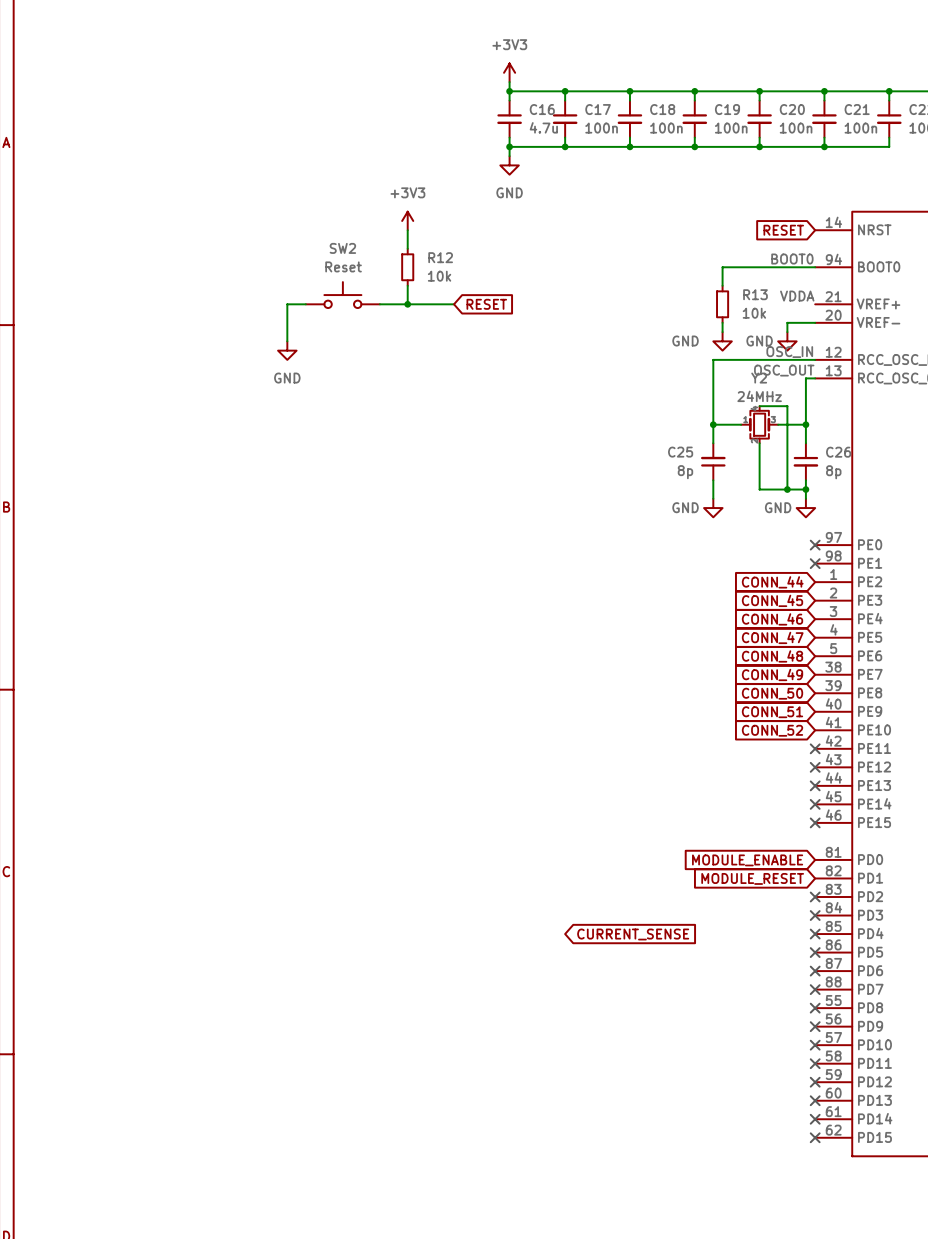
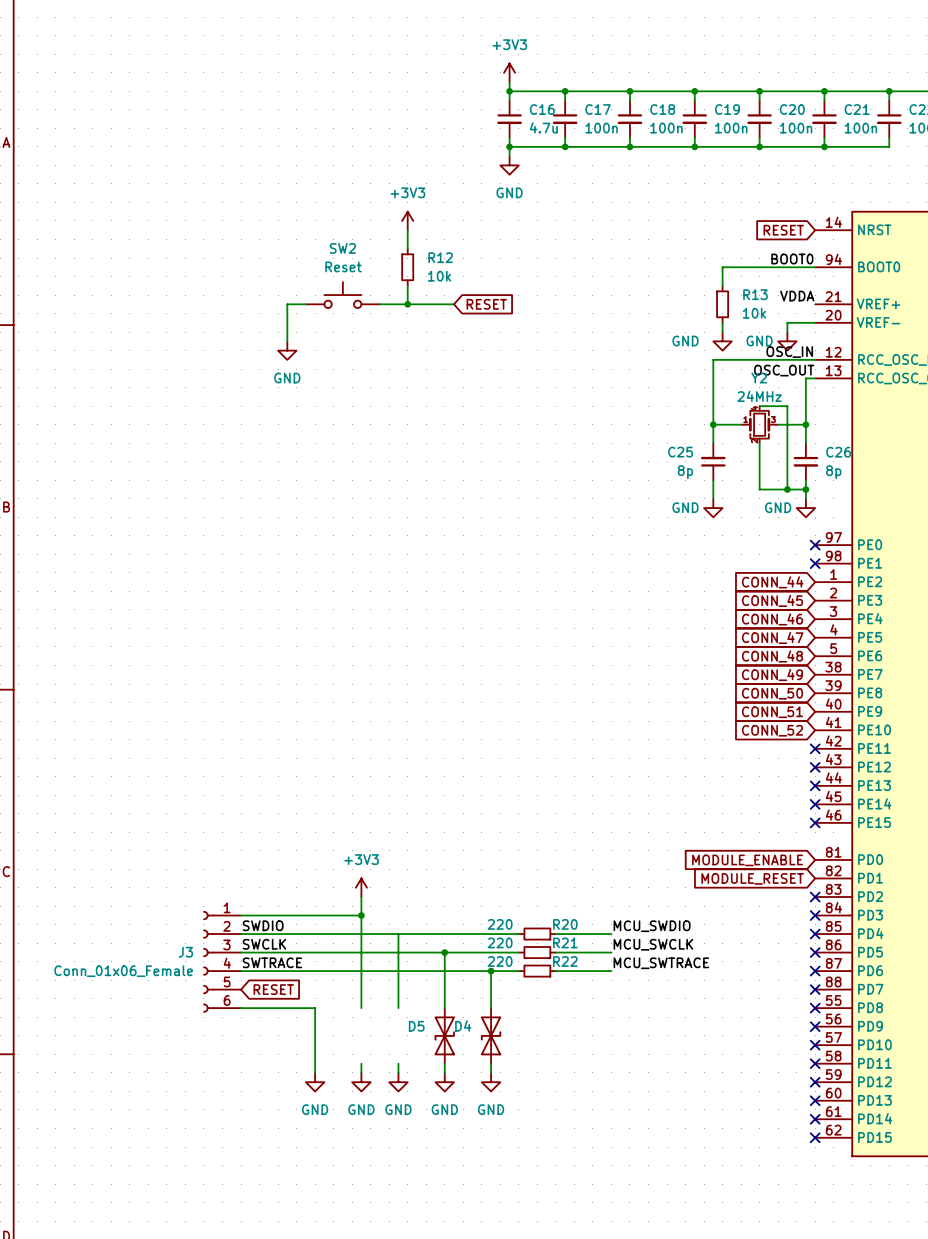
power symbol: none -> +3V3 (361, 887)
wire: none -> (361, 897) (361, 1008)
wire: none -> (241, 915) (361, 915)
junction: none -> (361, 915)
label: none -> SWDIO (263, 925)
label: none -> MCU_SWDIO (652, 926)
wire: none -> (241, 934) (518, 934)
wire: none -> (398, 934) (398, 1008)
R20: none -> 220 (537, 934)
wire: none -> (555, 934) (611, 934)
global label: CURRENT_SENSE (633, 934) -> none
label: none -> SWCLK (264, 944)
label: none -> MCU_SWCLK (653, 944)
wire: none -> (241, 952) (518, 952)
wire: none -> (444, 952) (444, 1008)
junction: none -> (444, 952)
R21: none -> 220 (537, 952)
wire: none -> (555, 952) (611, 952)
J3: none -> Conn_01x06_Female (222, 961)
label: none -> SWTRACE (272, 962)
label: none -> MCU_SWTRACE (661, 963)
wire: none -> (241, 971) (518, 971)
wire: none -> (491, 971) (491, 1008)
junction: none -> (491, 971)
R22: none -> 220 (537, 971)
wire: none -> (555, 971) (611, 971)
global label: none -> RESET (273, 989)
wire: none -> (241, 1008) (315, 1008) (315, 1072)
D5: none -> (444, 1035)
D4: none -> (491, 1035)
wire: none -> (361, 1063) (361, 1072)
wire: none -> (398, 1063) (398, 1072)
wire: none -> (444, 1063) (444, 1072)
wire: none -> (491, 1063) (491, 1072)
power symbol: none -> GND (315, 1082)
power symbol: none -> GND (361, 1082)
power symbol: none -> GND (398, 1082)
power symbol: none -> GND (444, 1082)
power symbol: none -> GND (491, 1082)

